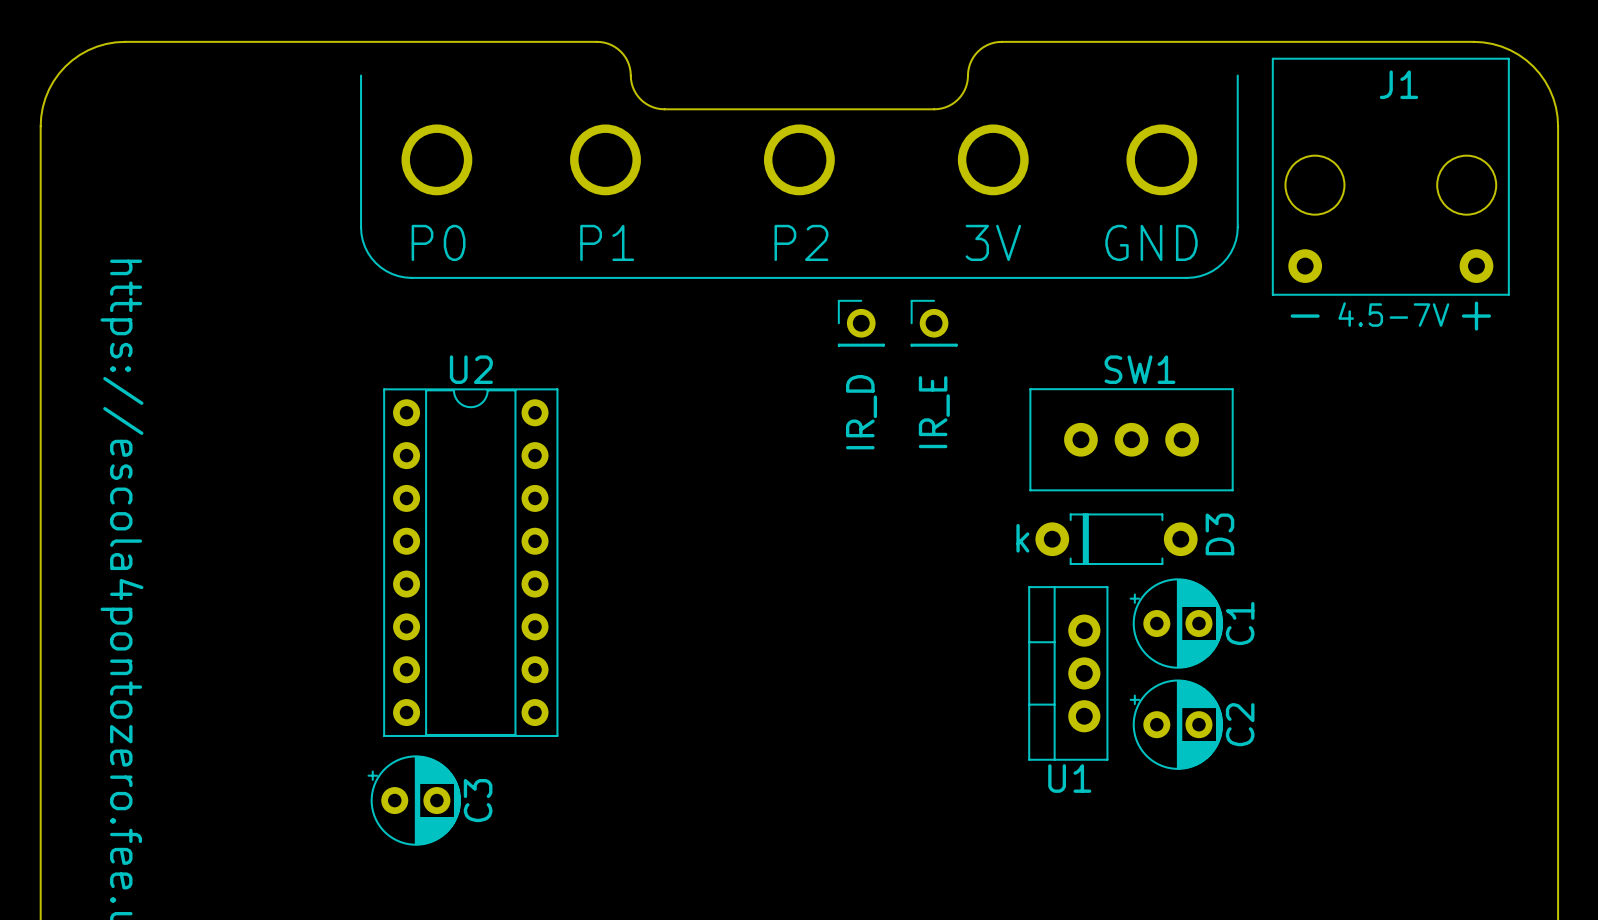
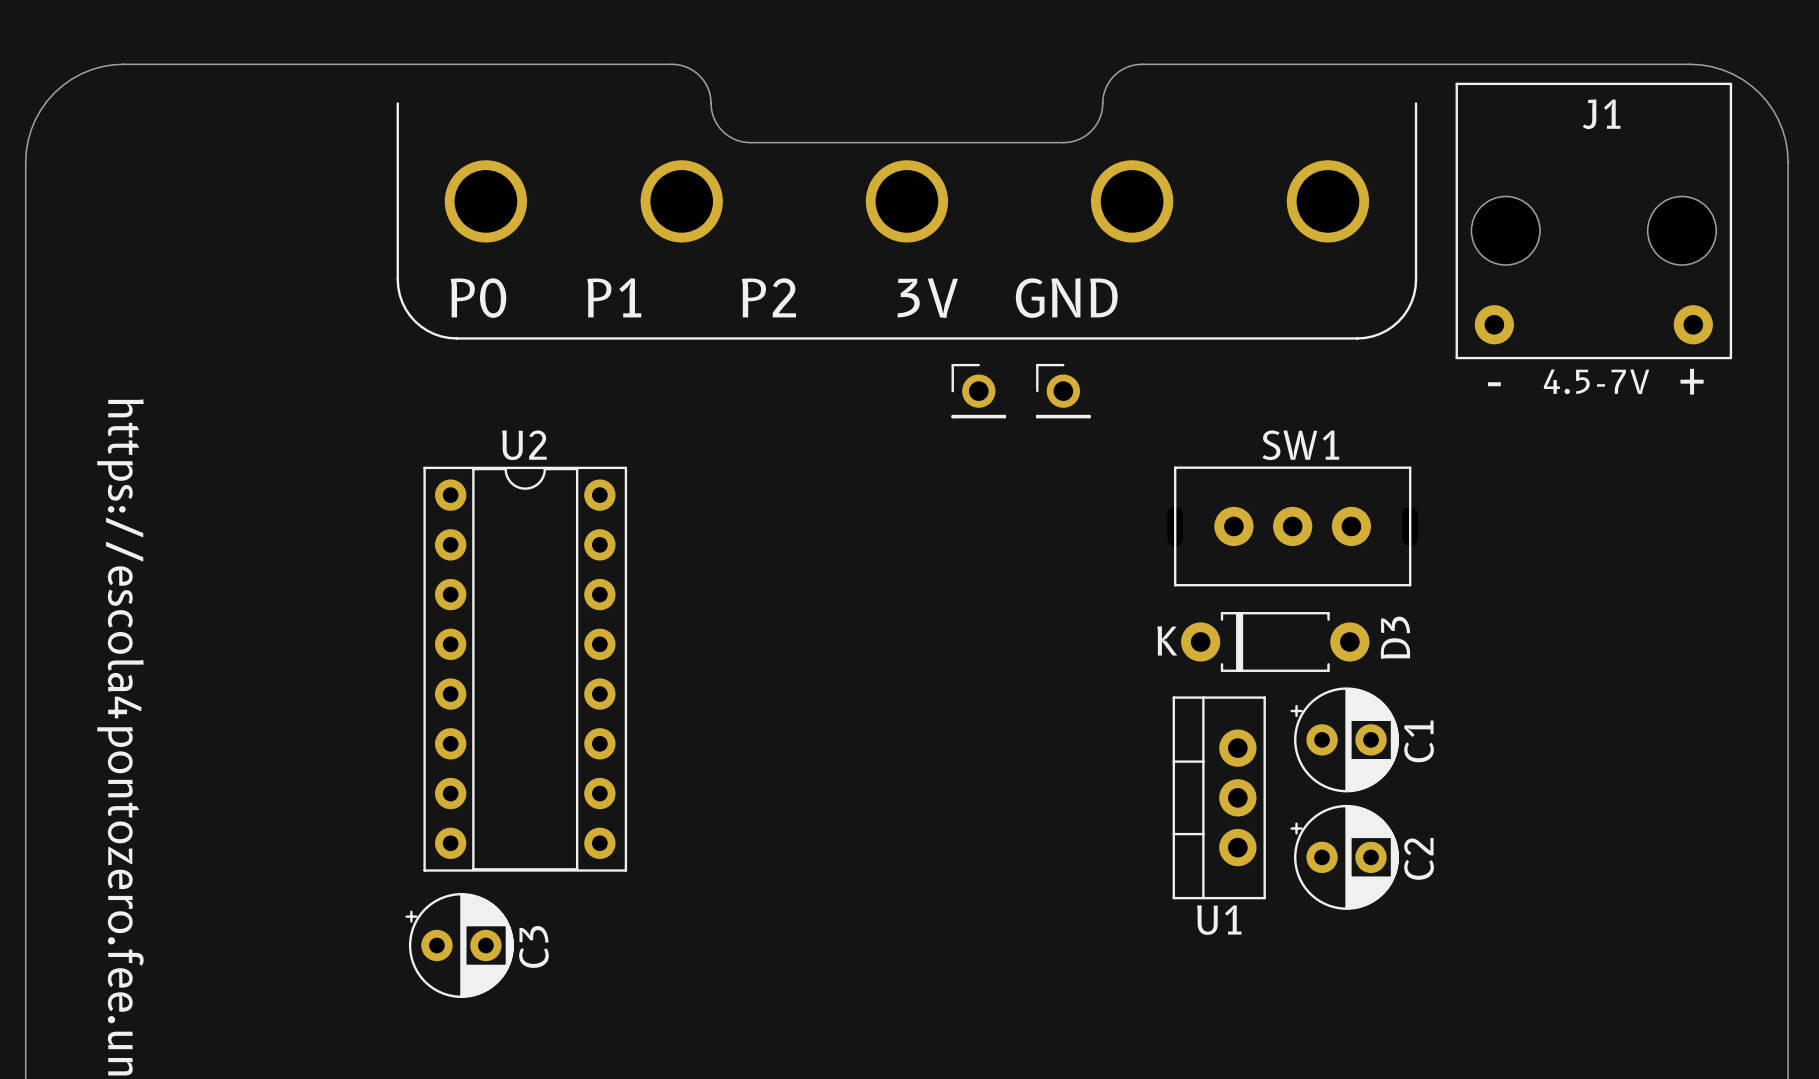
part text: IR_D (861, 412) -> none
part text: IR_E (934, 412) -> none
D3 text: k (1022, 538) -> K (1167, 640)

